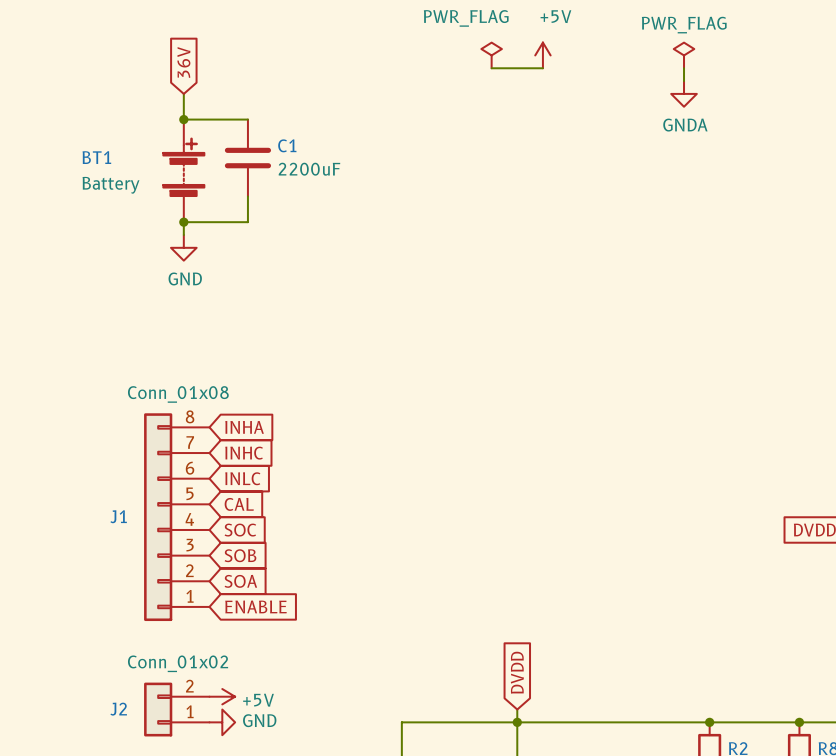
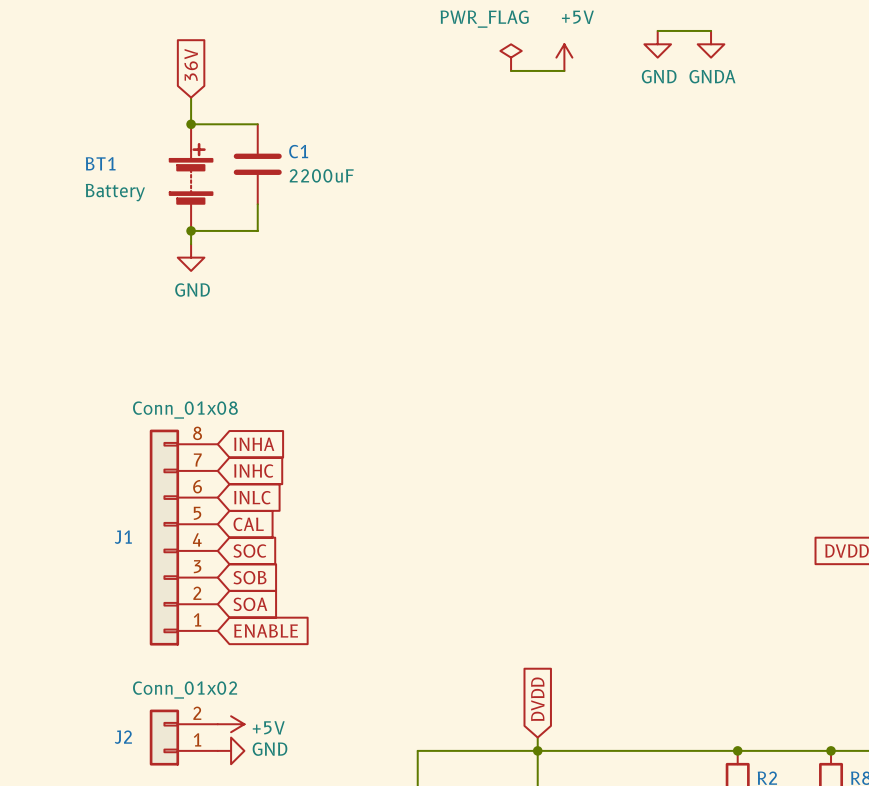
wire: none -> (657, 30) (711, 30)
power symbol: none -> GND (657, 44)
power symbol: PWR_FLAG (684, 55) -> none
wire: (684, 68) (684, 81) -> none
power symbol position: GNDA (684, 93) -> GNDA (711, 44)

